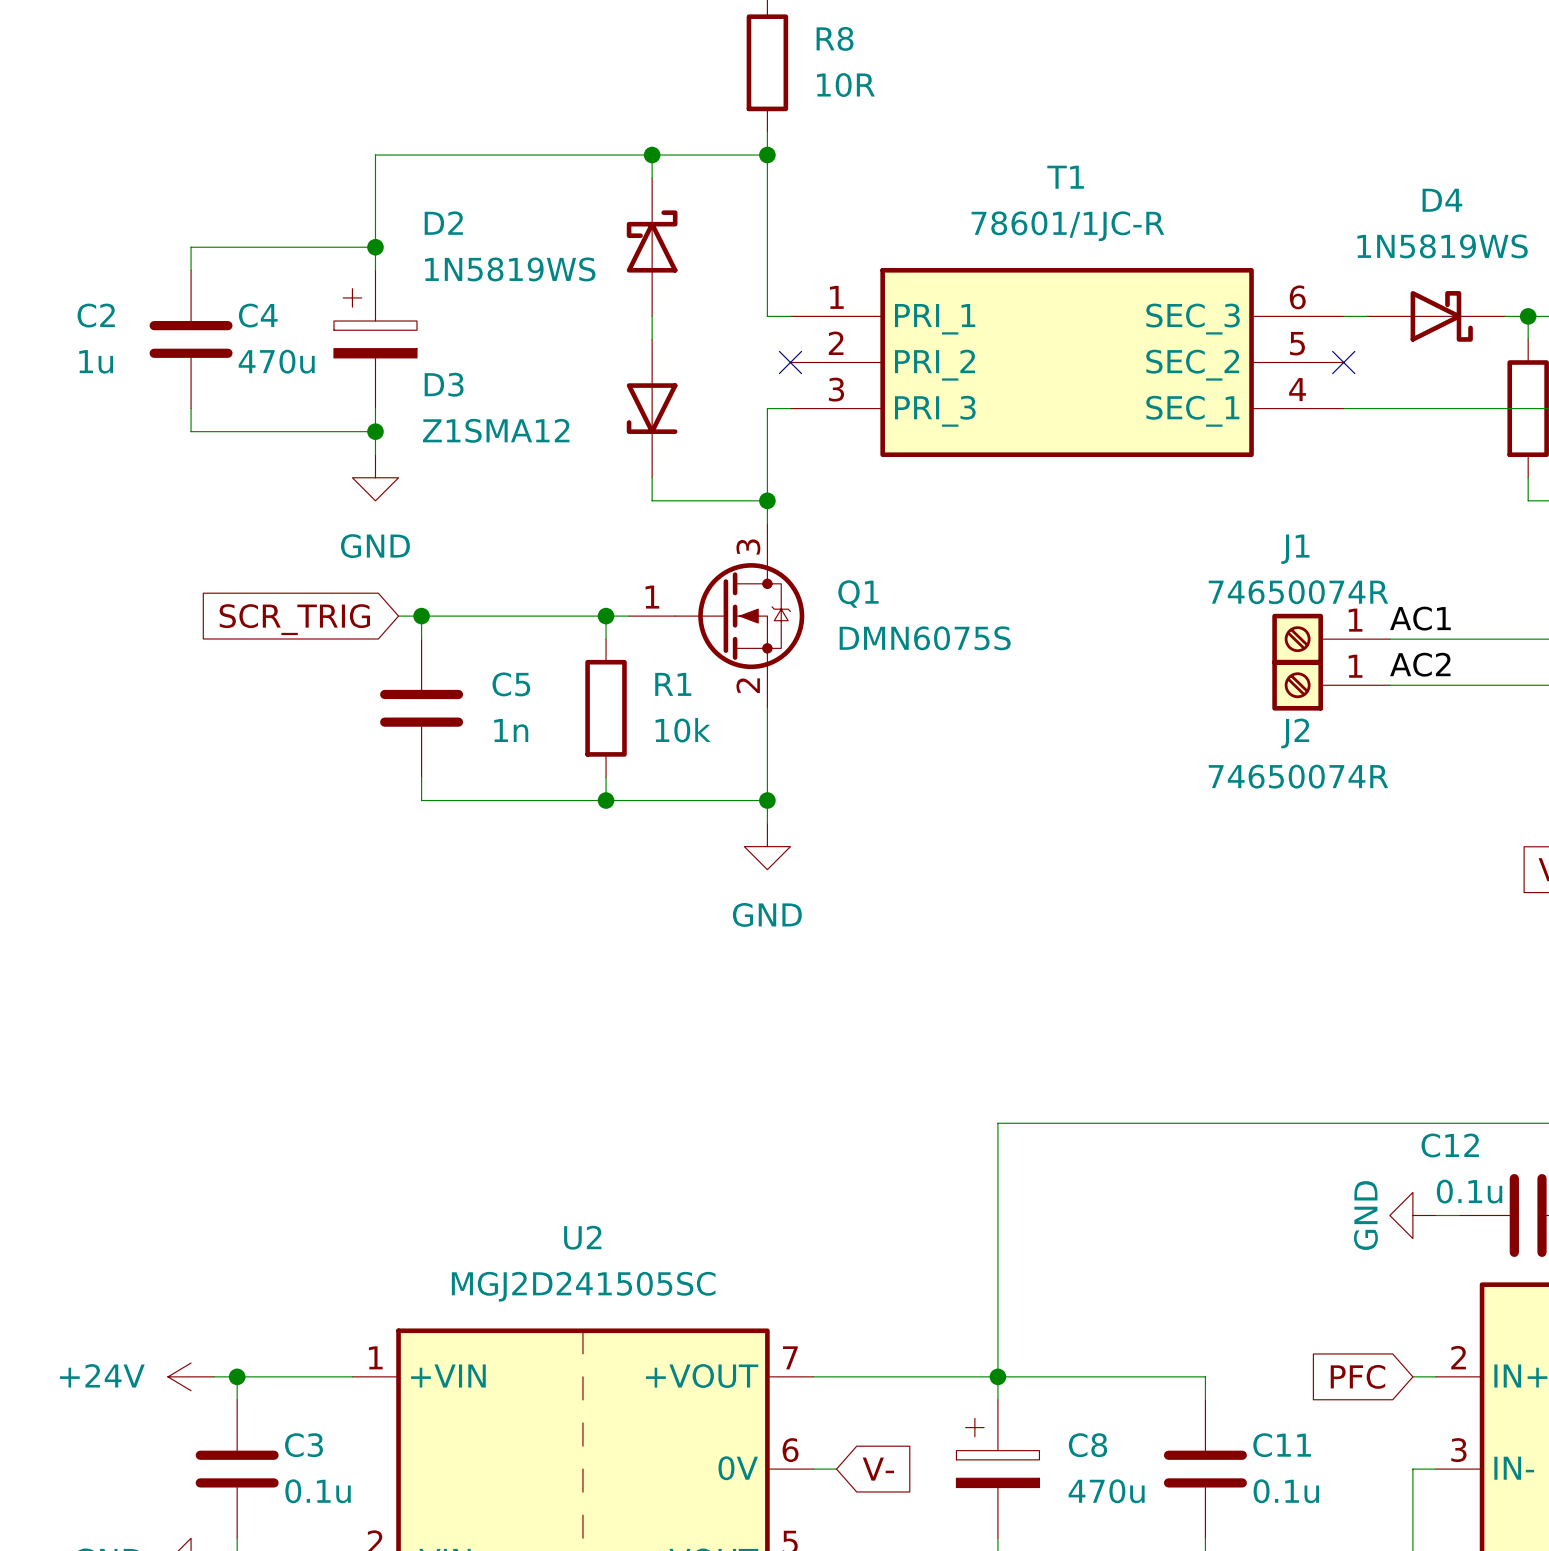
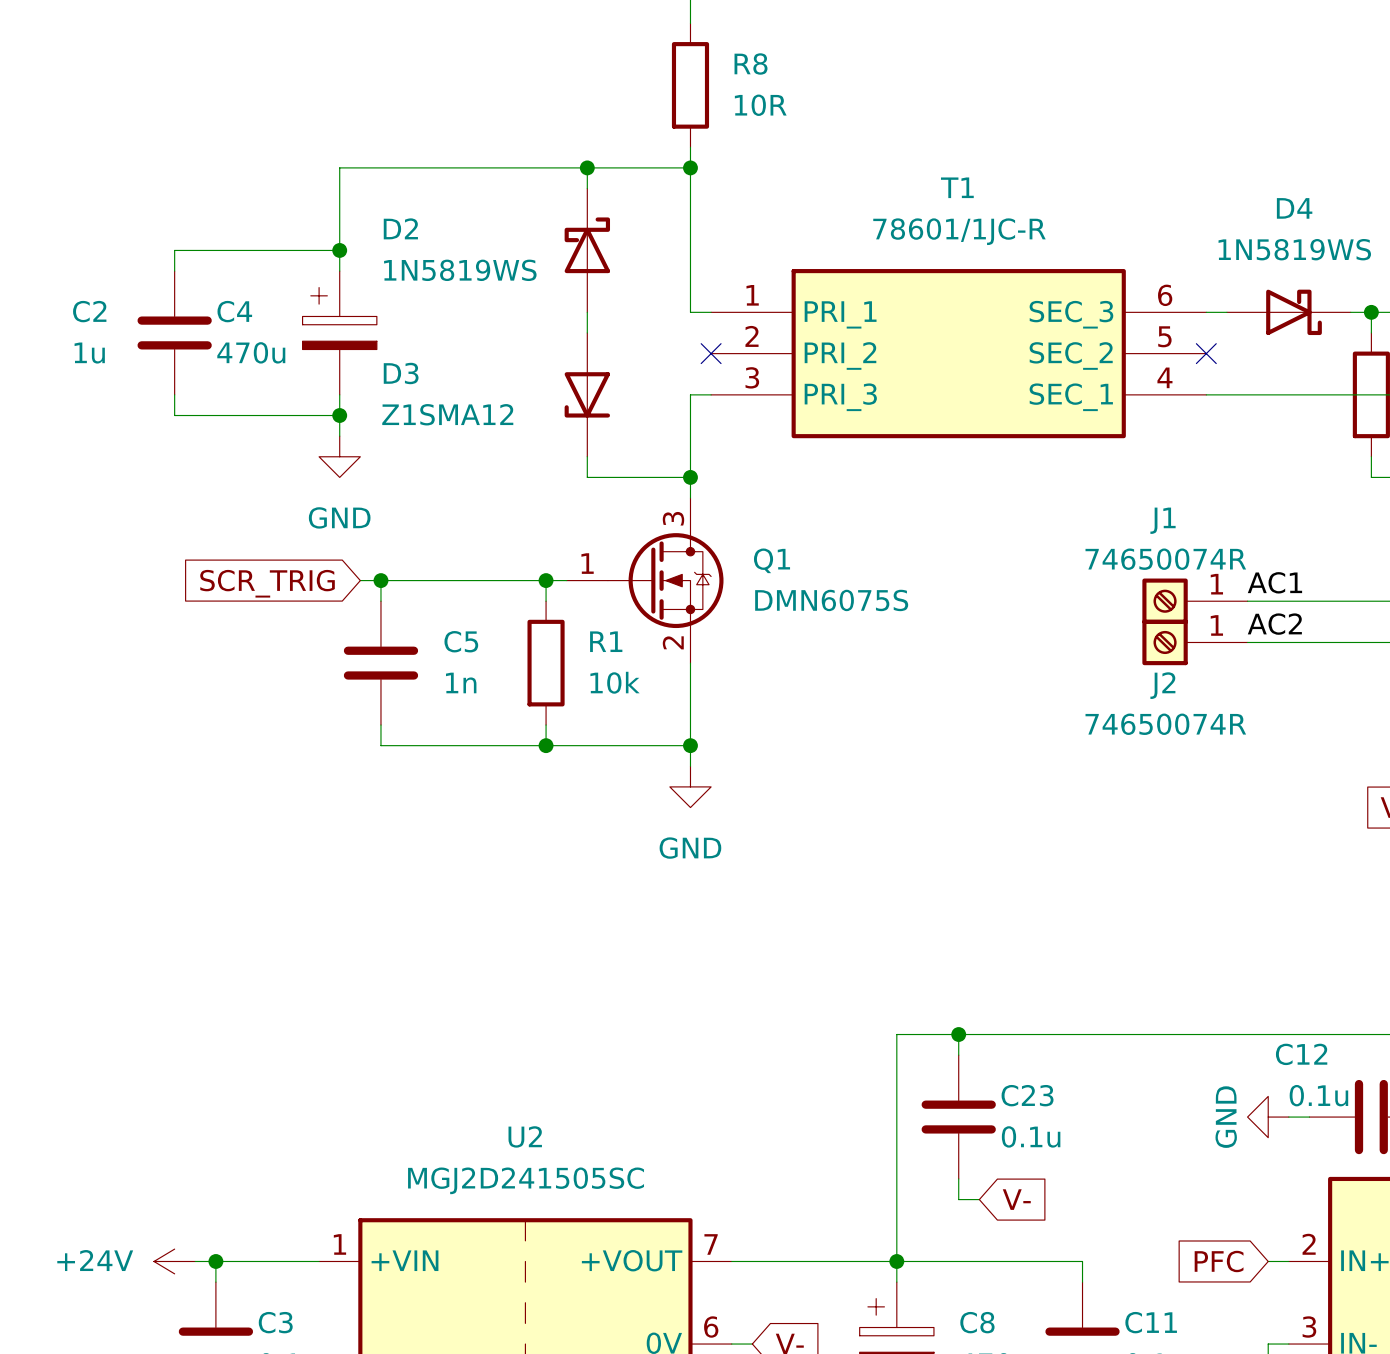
wire: none -> (958, 1034) (958, 1055)
junction: none -> (958, 1034)
C23: none -> 0.1u (958, 1117)
wire: none -> (958, 1178) (958, 1199) (979, 1199)
global label: none -> V- (1016, 1199)

